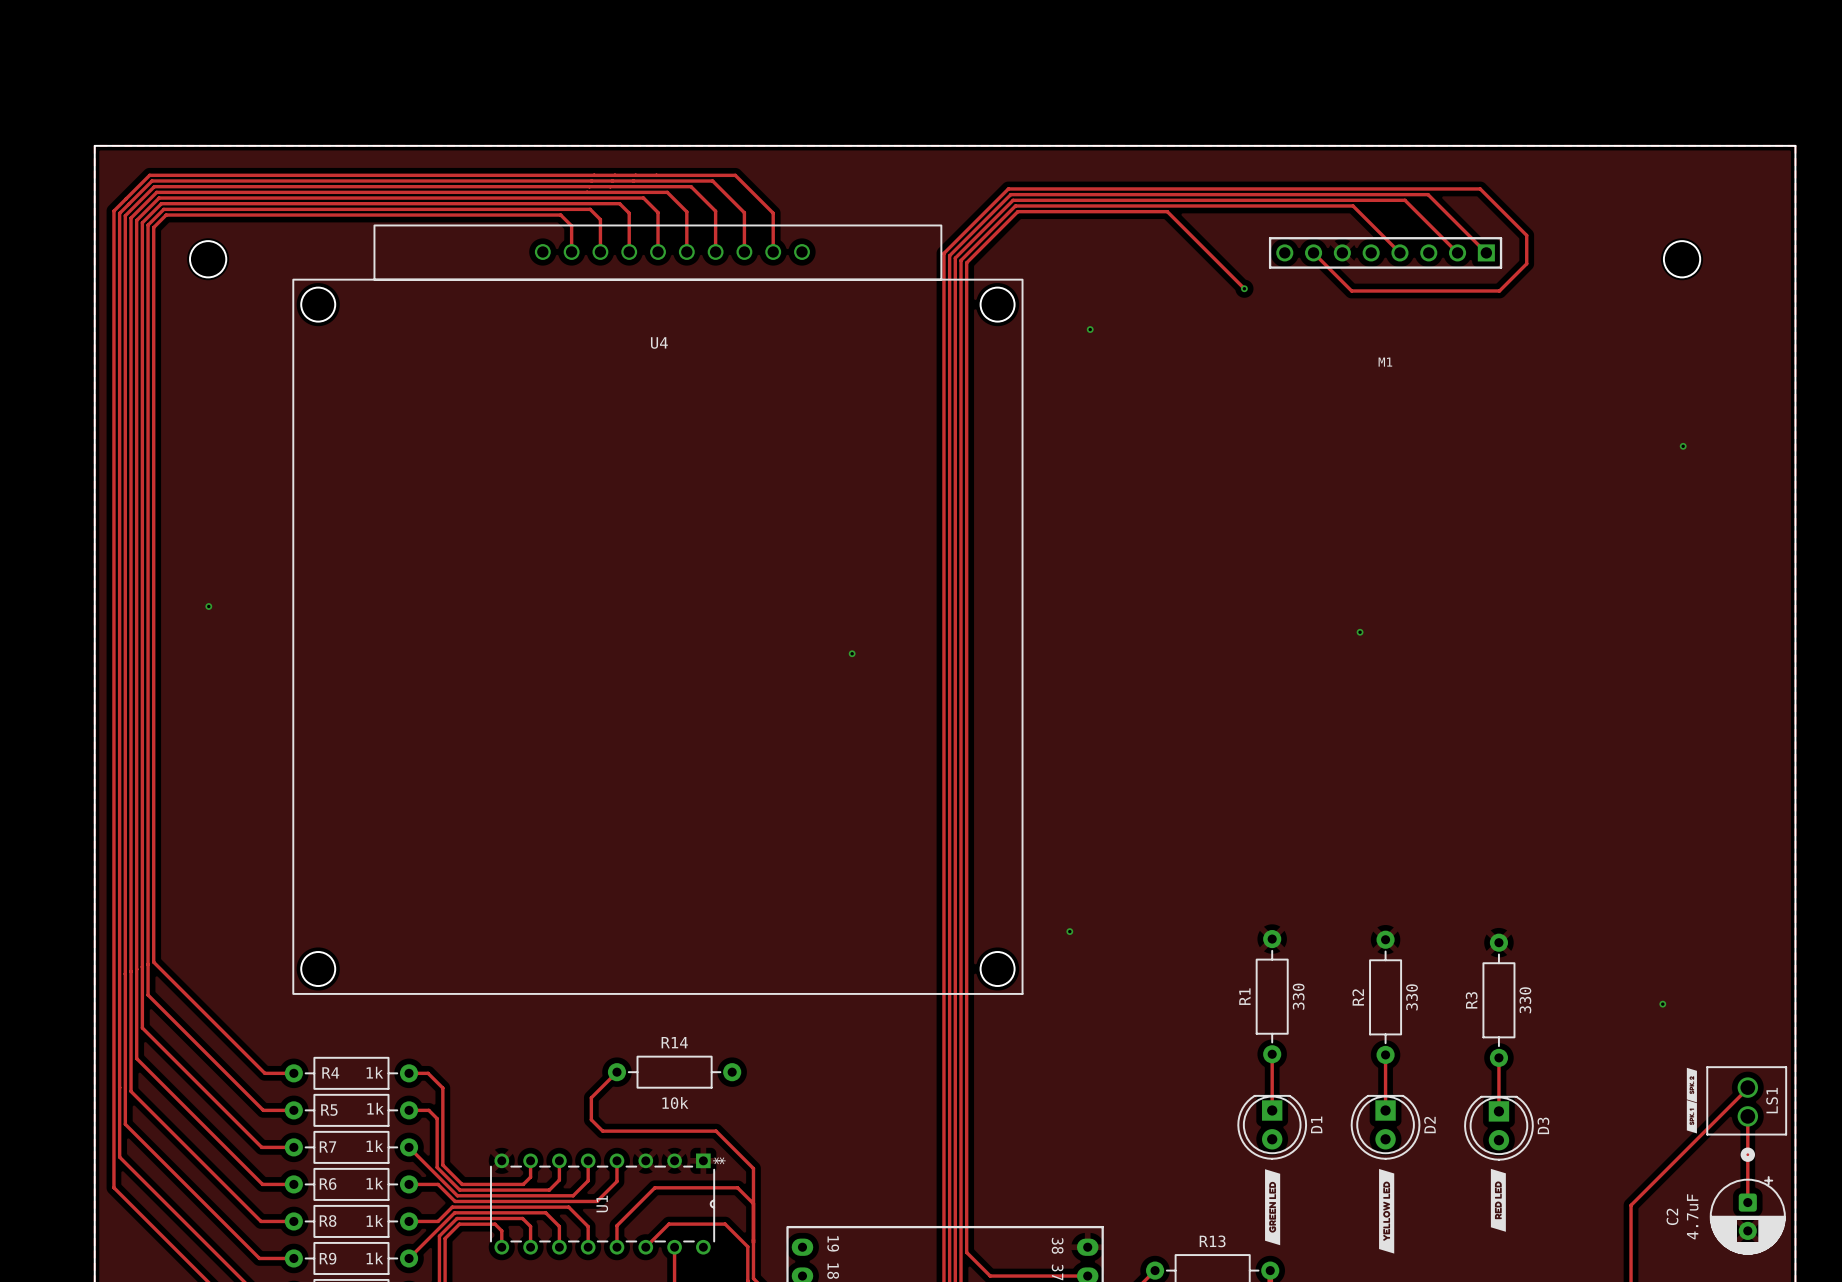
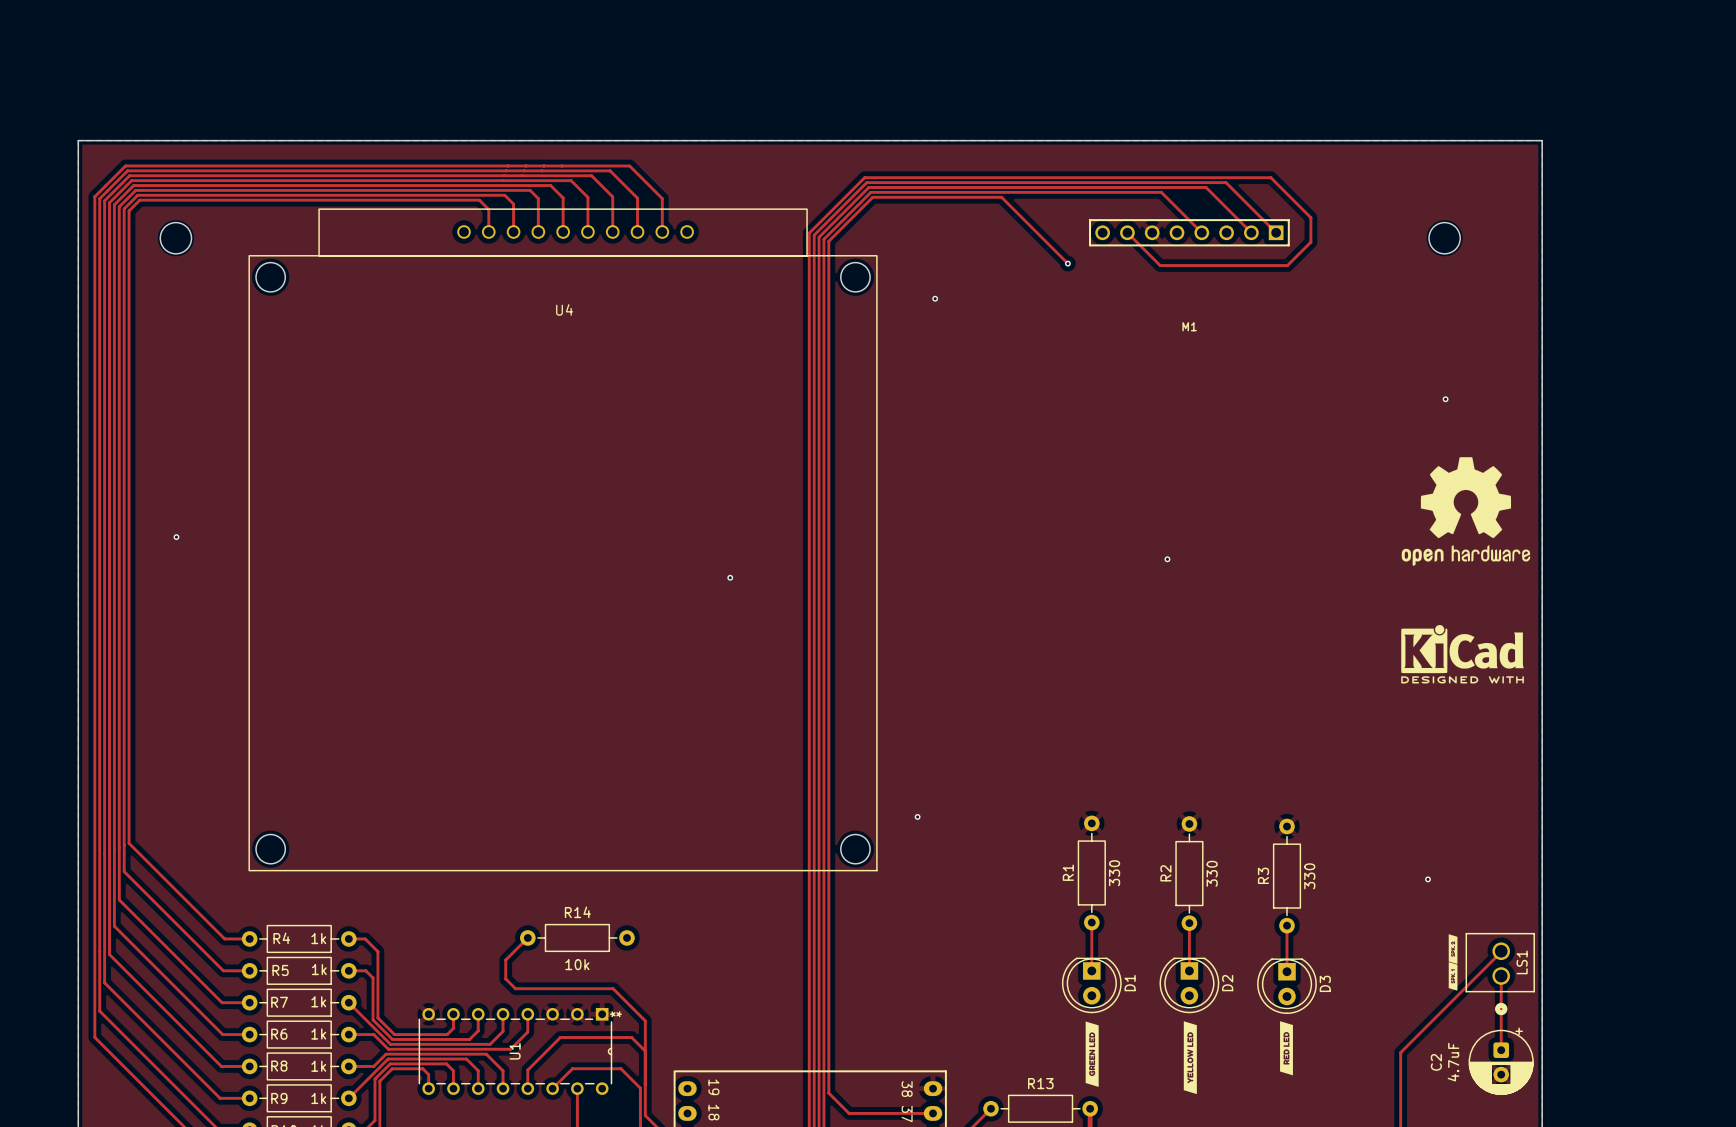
drawing: none -> [1401, 457, 1531, 566]
drawing: none -> [1401, 625, 1524, 684]

